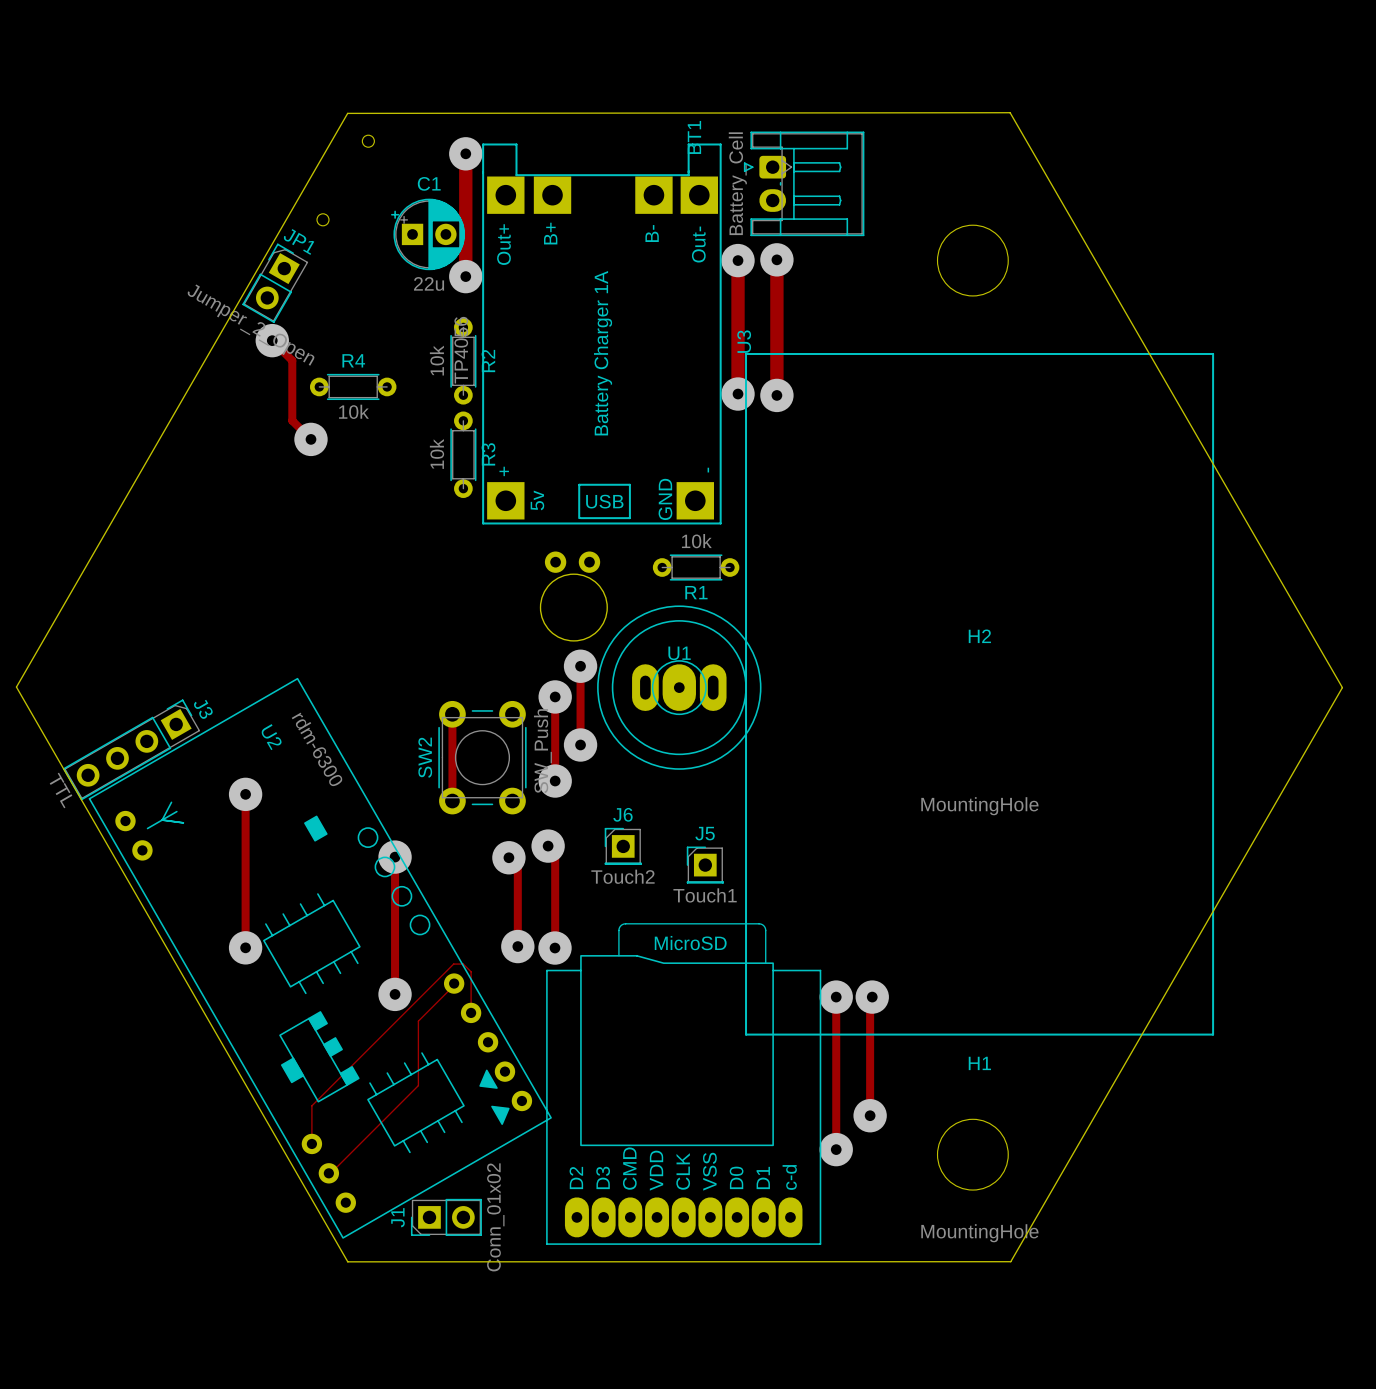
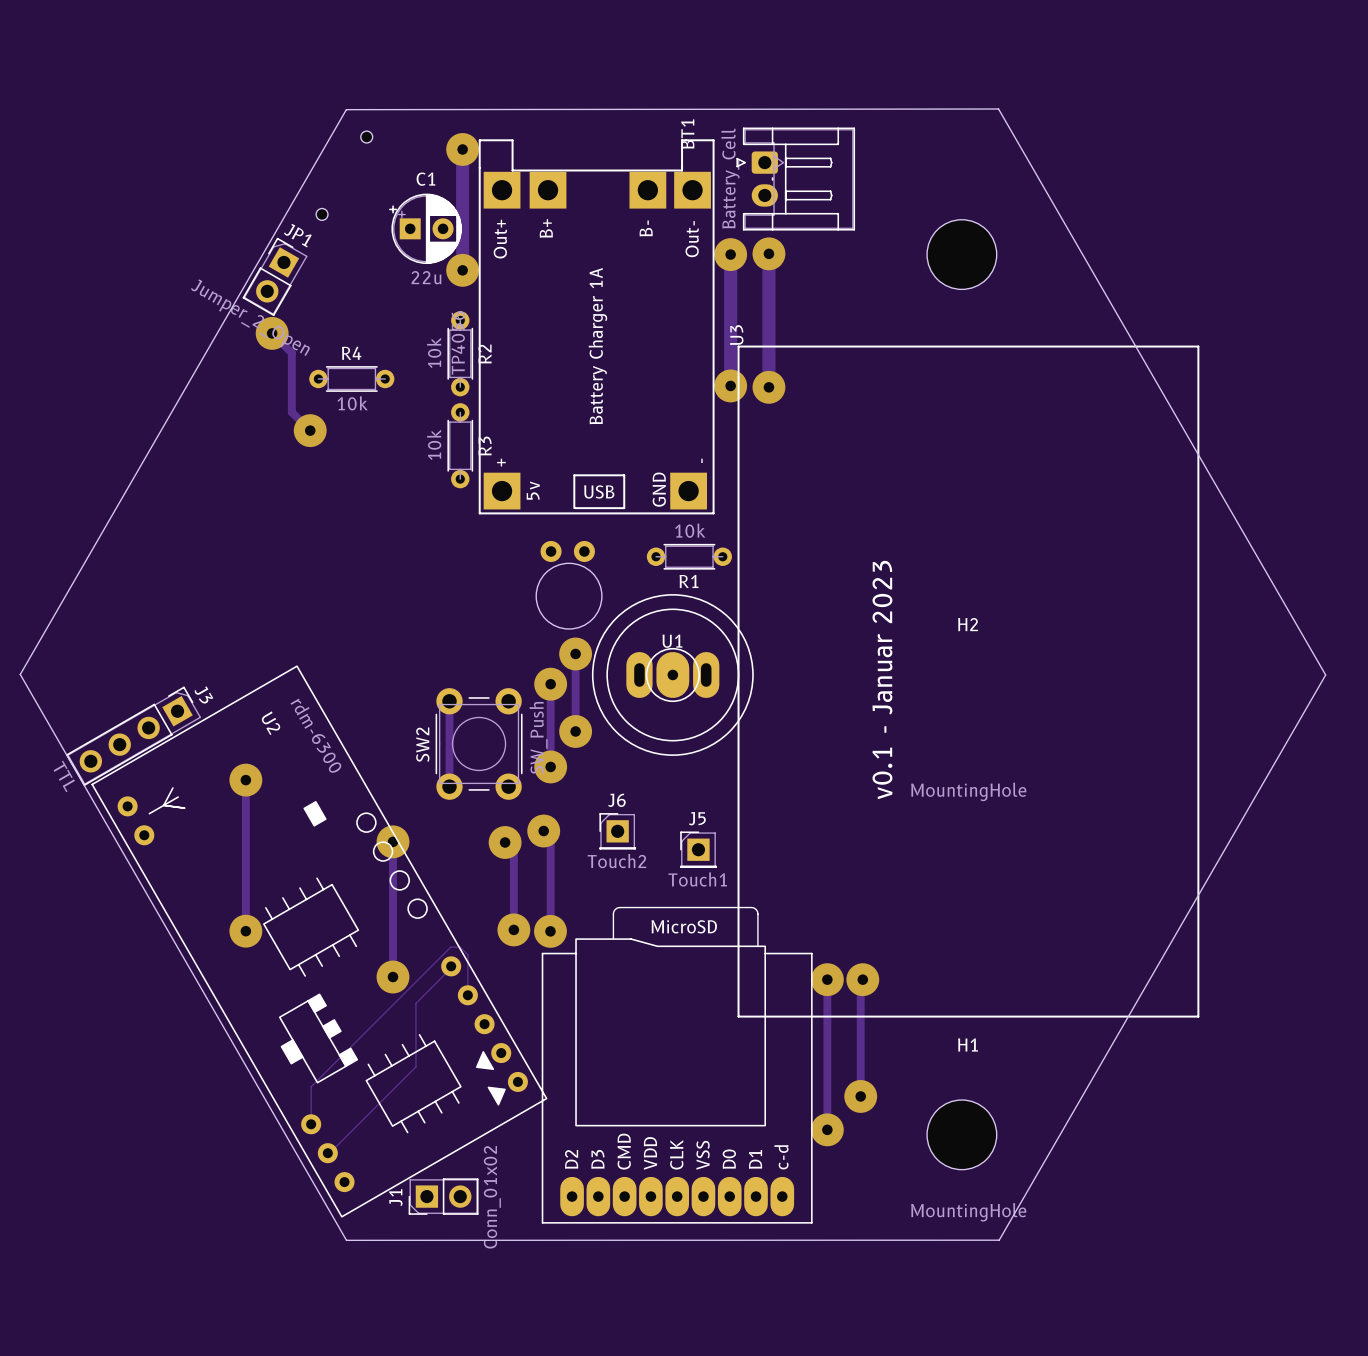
text: none -> v0.1 - Januar 2023 (882, 680)

